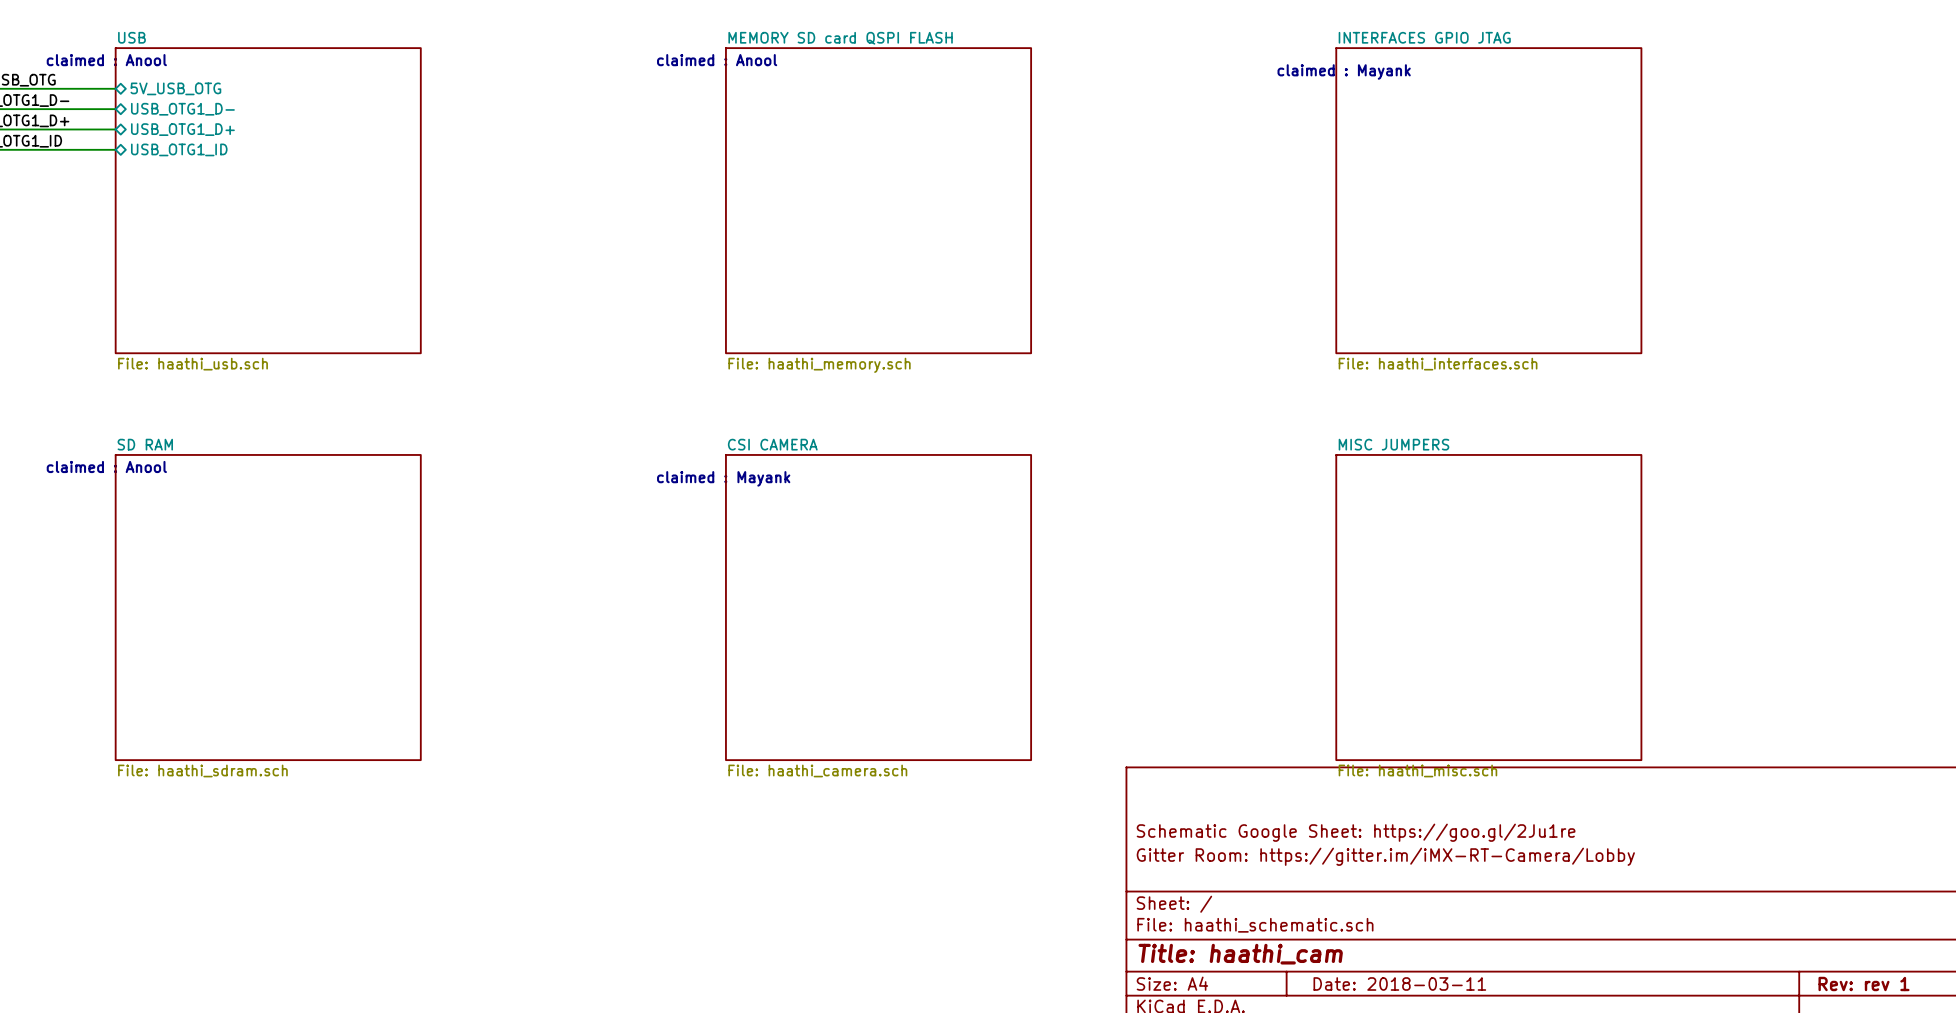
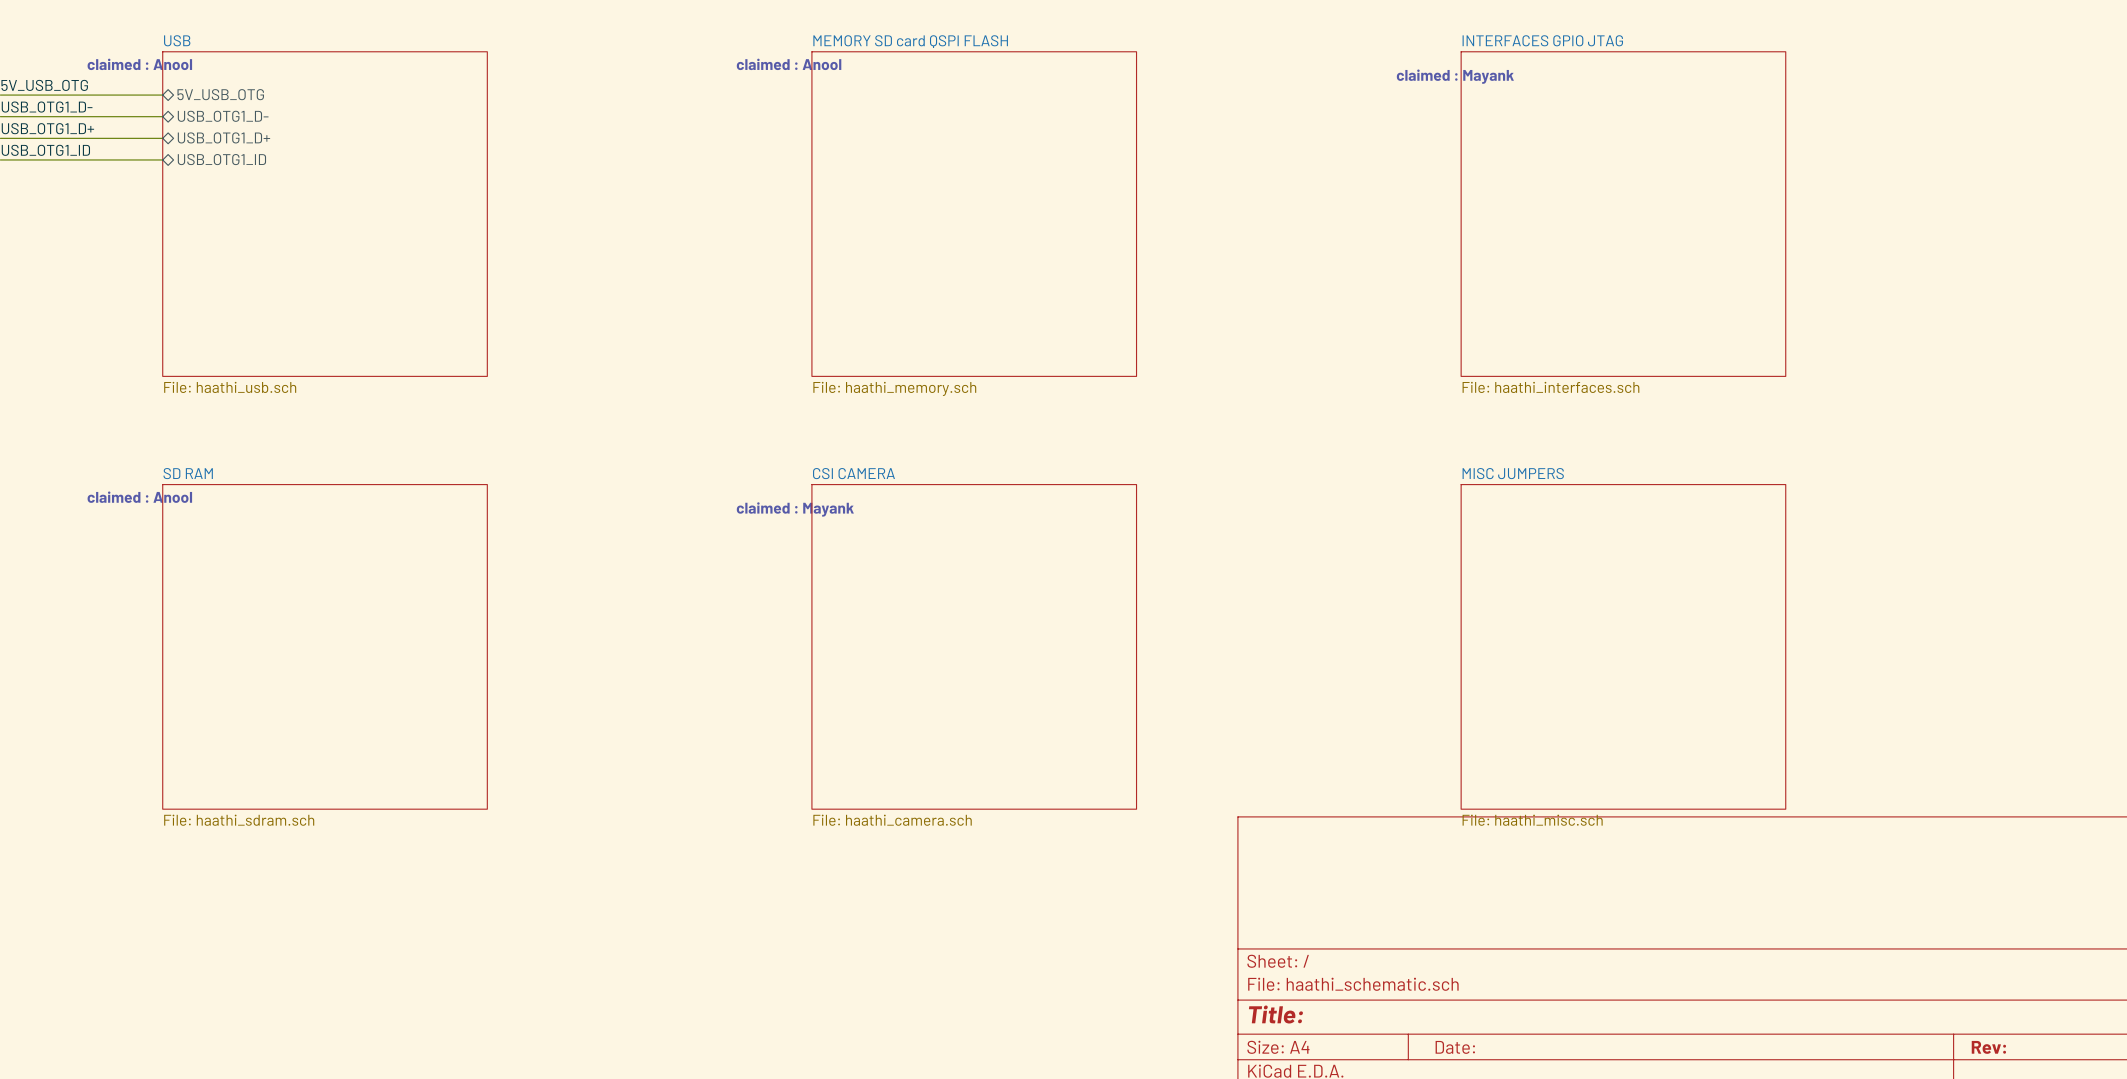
title block: Schematic Google Sheet: https://goo.gl/2Ju1re (1356, 832) -> none
title block: Gitter Room: https://gitter.im/iMX-RT-Camera/Lobby (1385, 856) -> none
title block: Title: haathi_cam (1240, 954) -> Title: (1275, 1014)
title block: Date: 2018-03-11 (1399, 983) -> Date: (1455, 1047)
title block: Rev: rev 1 (1864, 983) -> Rev: (1988, 1047)

